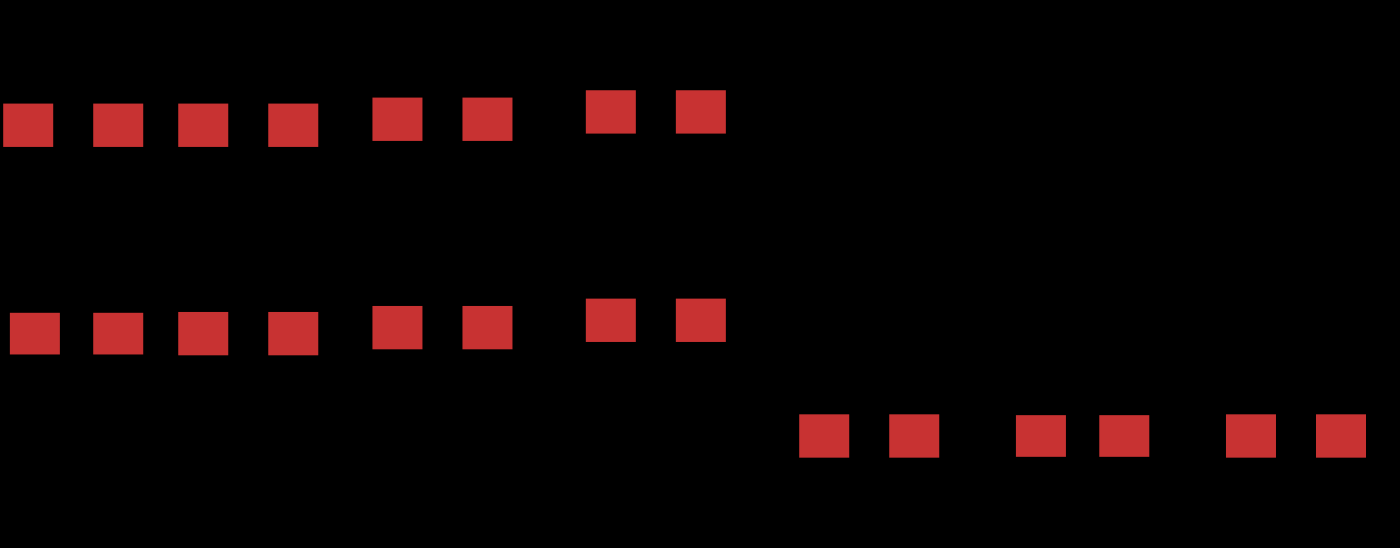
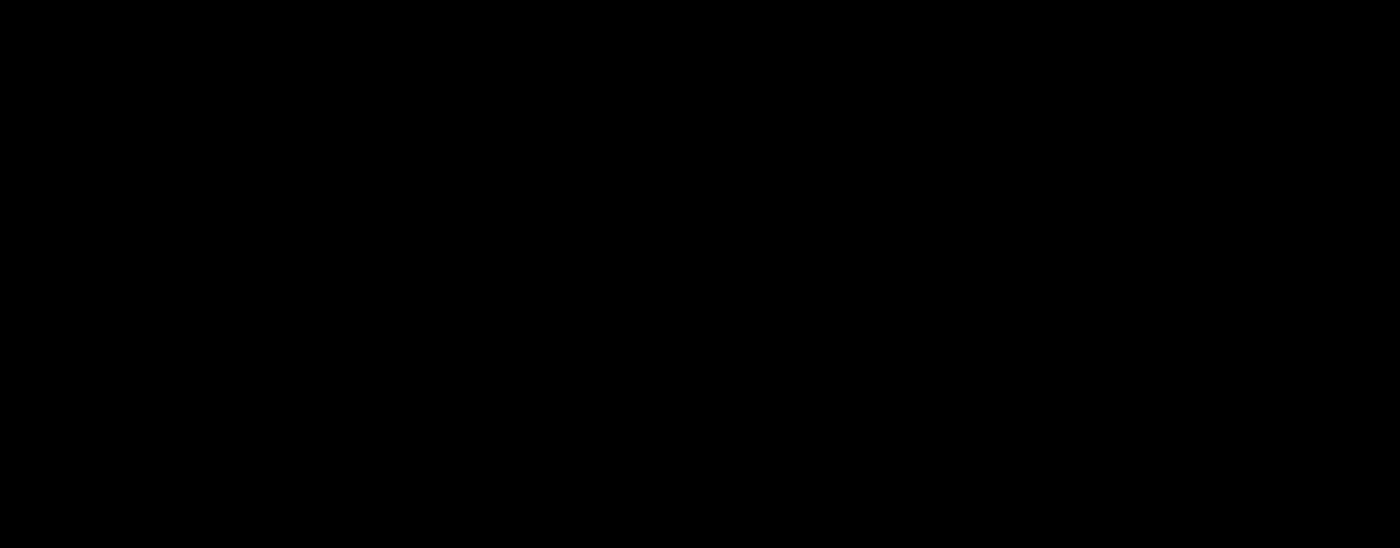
part: (655, 111) -> none
part: (442, 119) -> none
part: (73, 125) -> none
part: (248, 125) -> none
part: (655, 320) -> none
part: (442, 327) -> none
part: (76, 333) -> none
part: (248, 333) -> none
part: (869, 435) -> none
part: (1082, 435) -> none
part: (1295, 435) -> none

